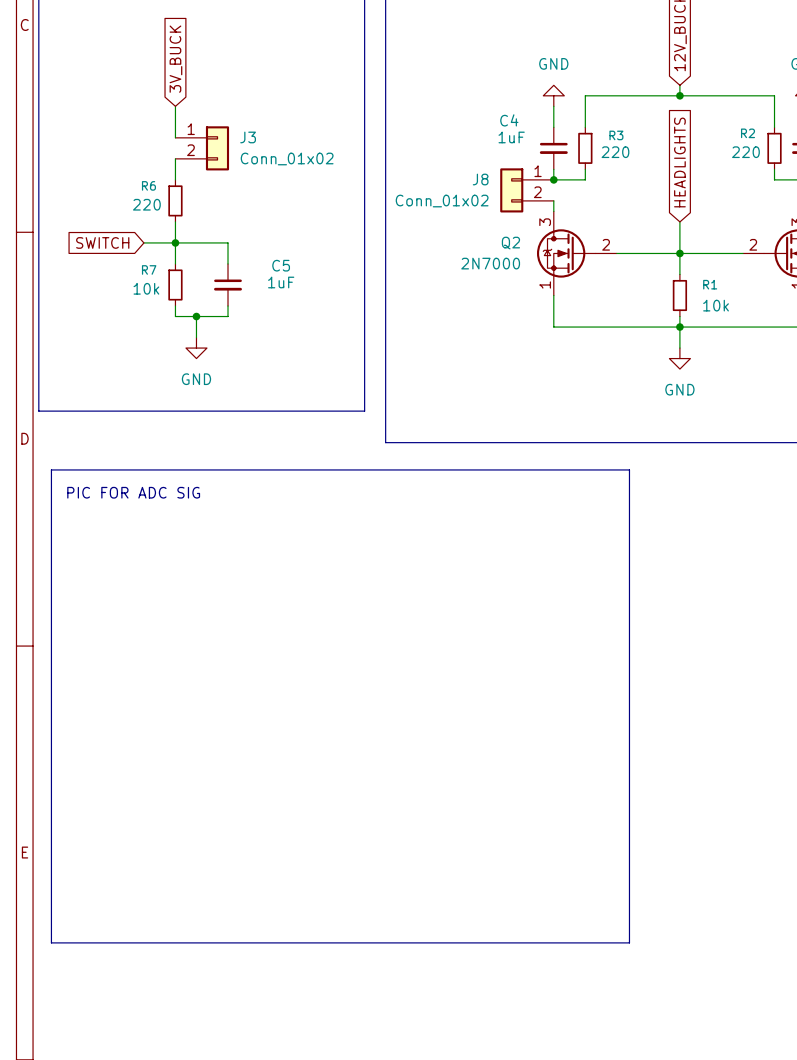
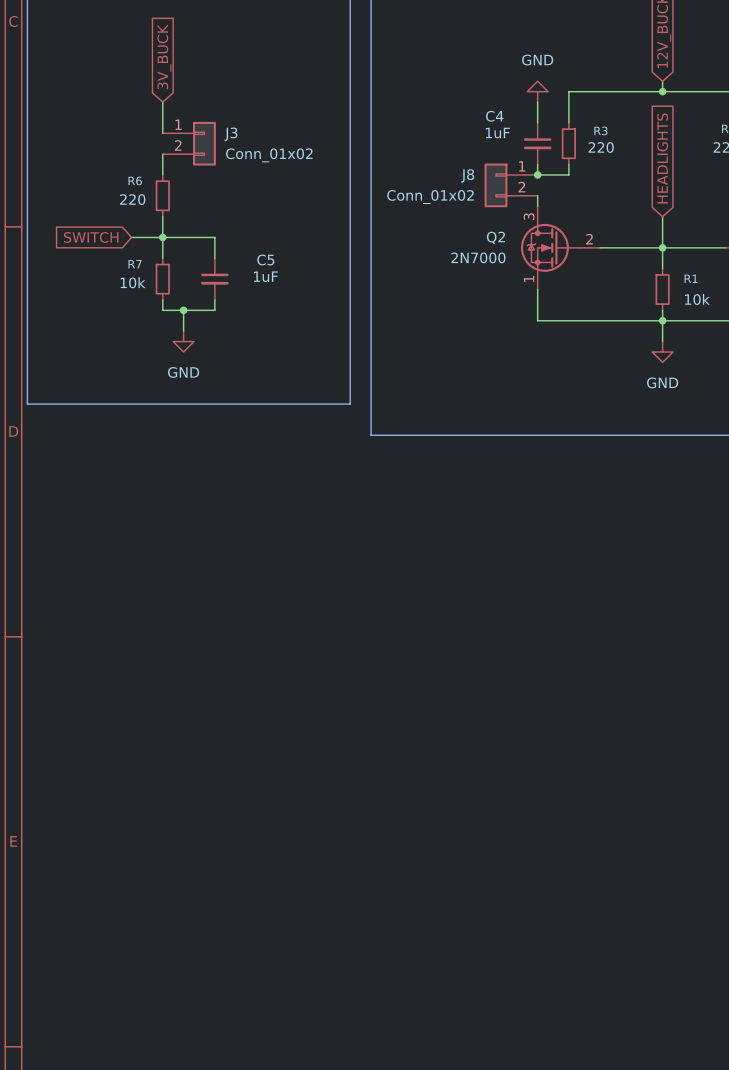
line: (51, 469) (629, 469) (629, 942) (51, 942) (51, 469) -> none
text: PIC FOR ADC SIG (133, 492) -> none

